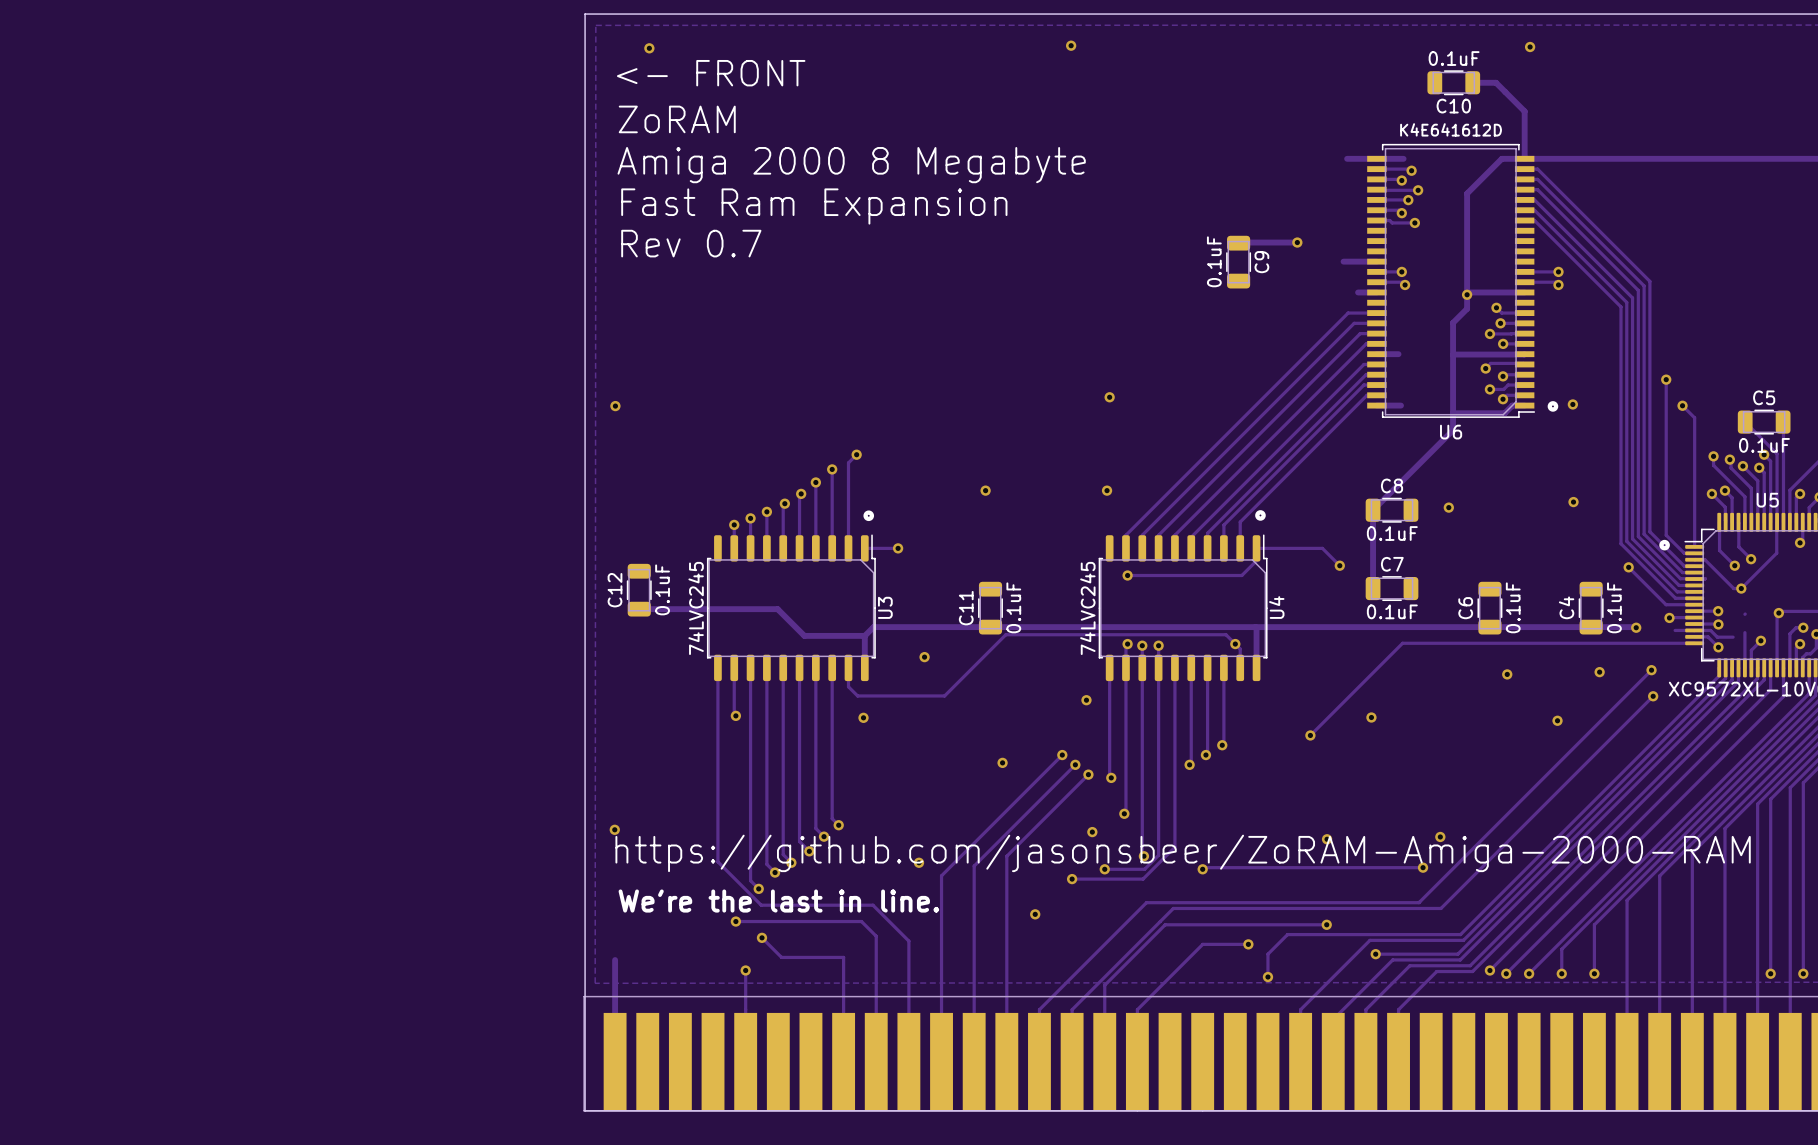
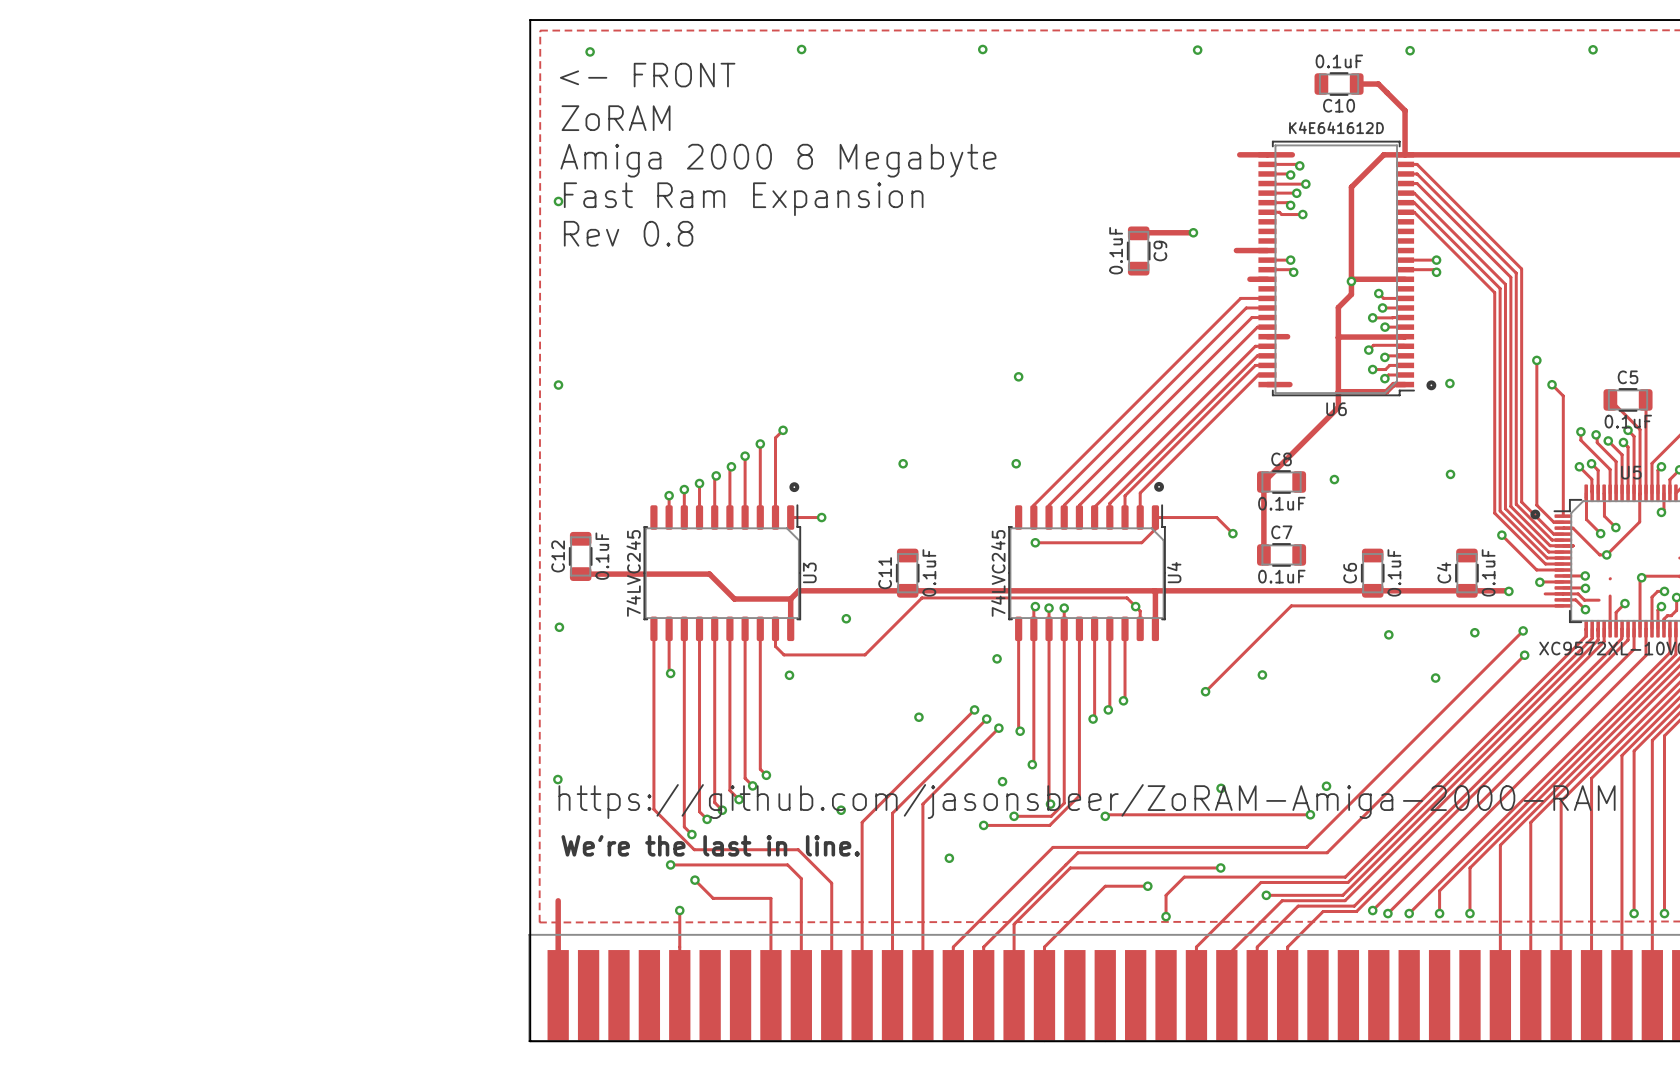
via: none -> (801, 49)
via: none -> (1197, 50)
via: none -> (1593, 49)
via: none -> (558, 201)
text: Rev 0.7 (691, 243) -> Rev 0.8 (628, 233)
via: none -> (559, 627)

